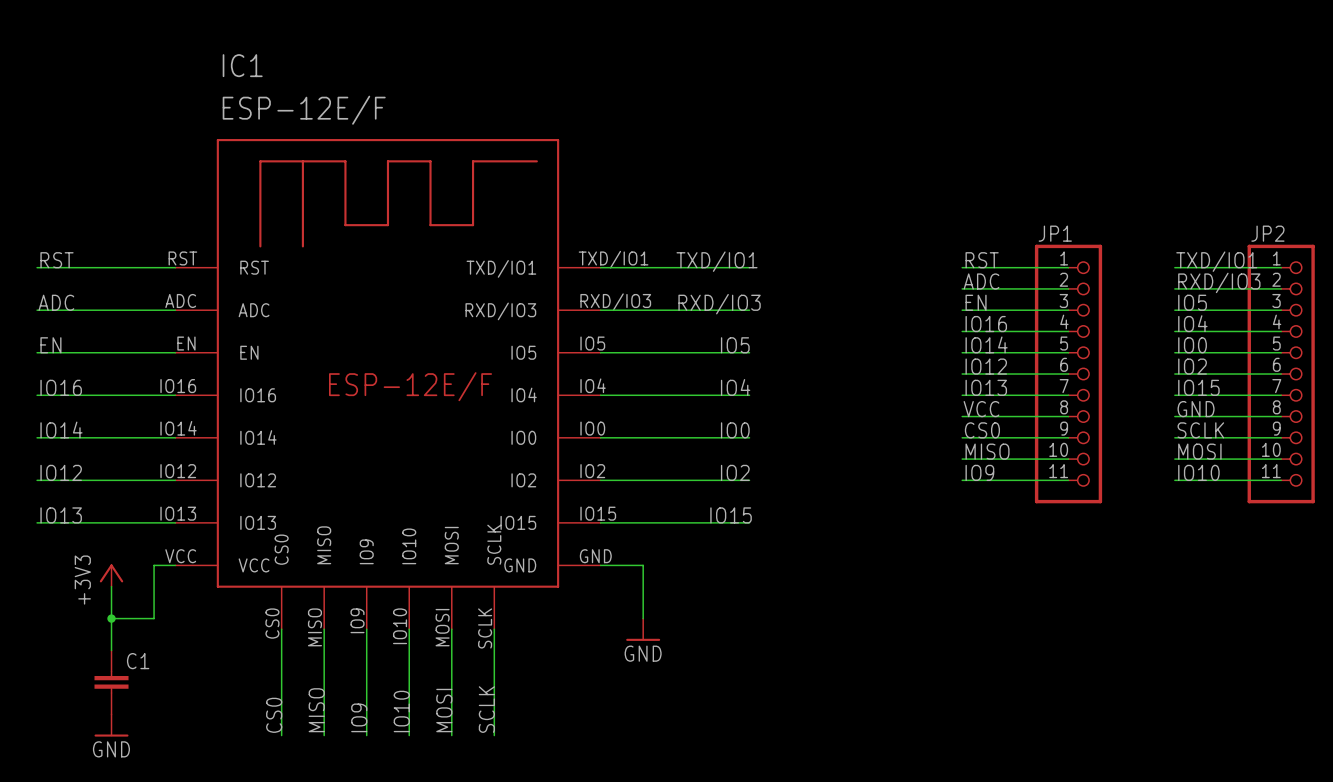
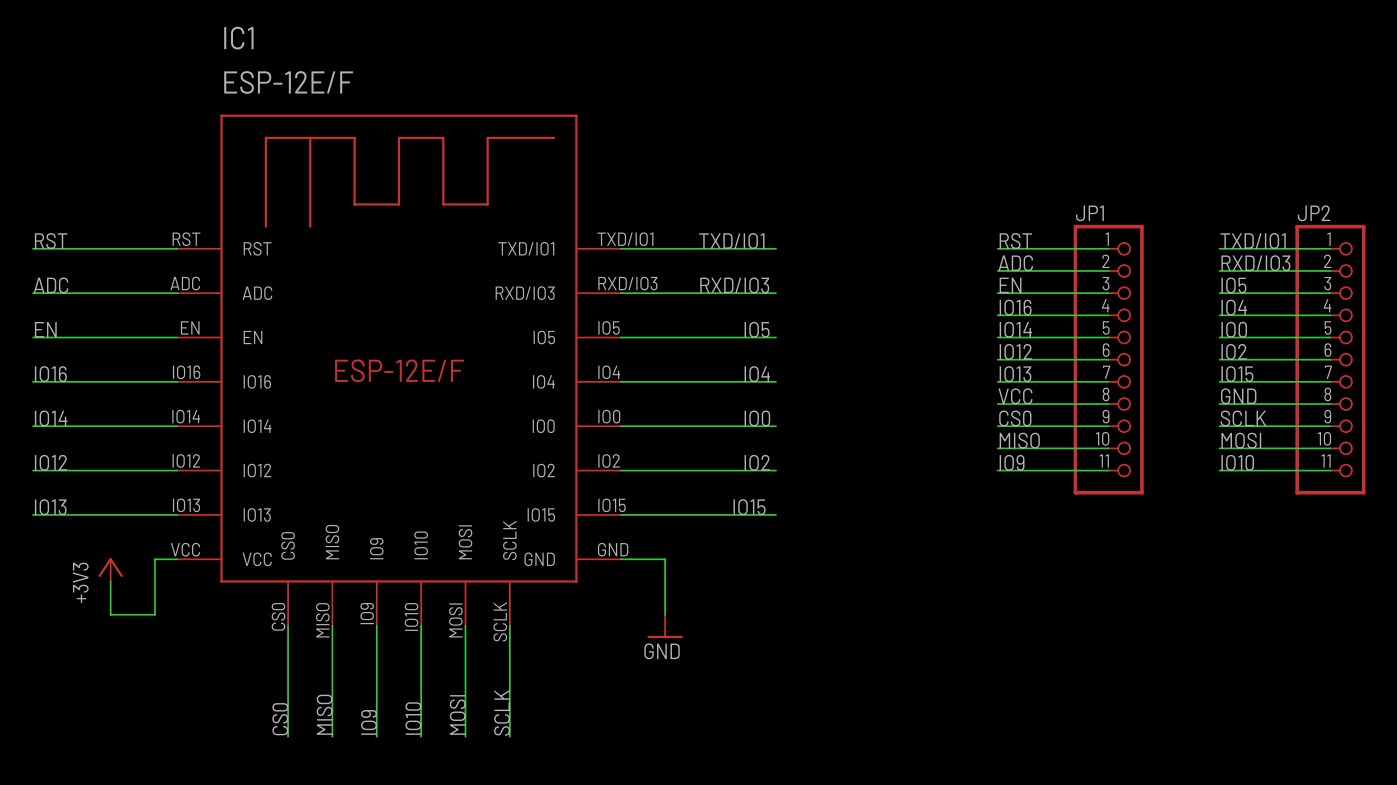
wire: (111, 618) (111, 650) -> none
junction: (111, 618) -> none
C1: (111, 682) -> none
power symbol: GND (111, 725) -> none

